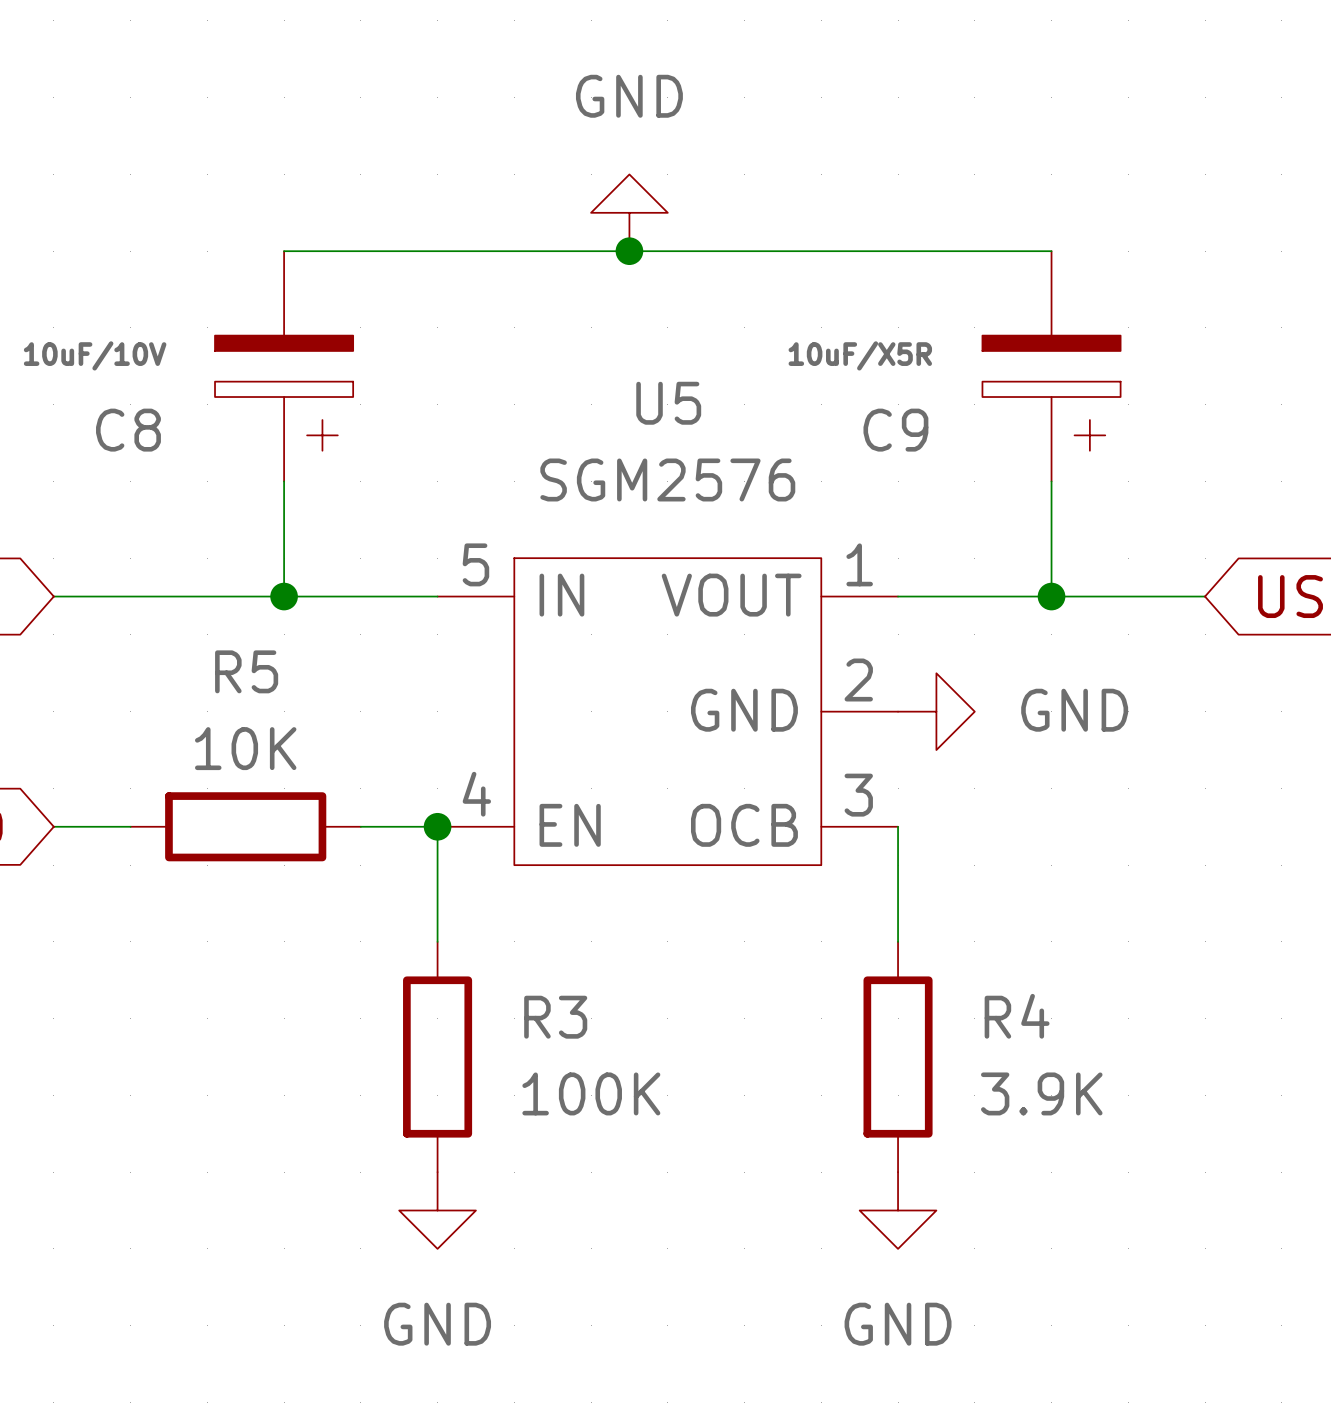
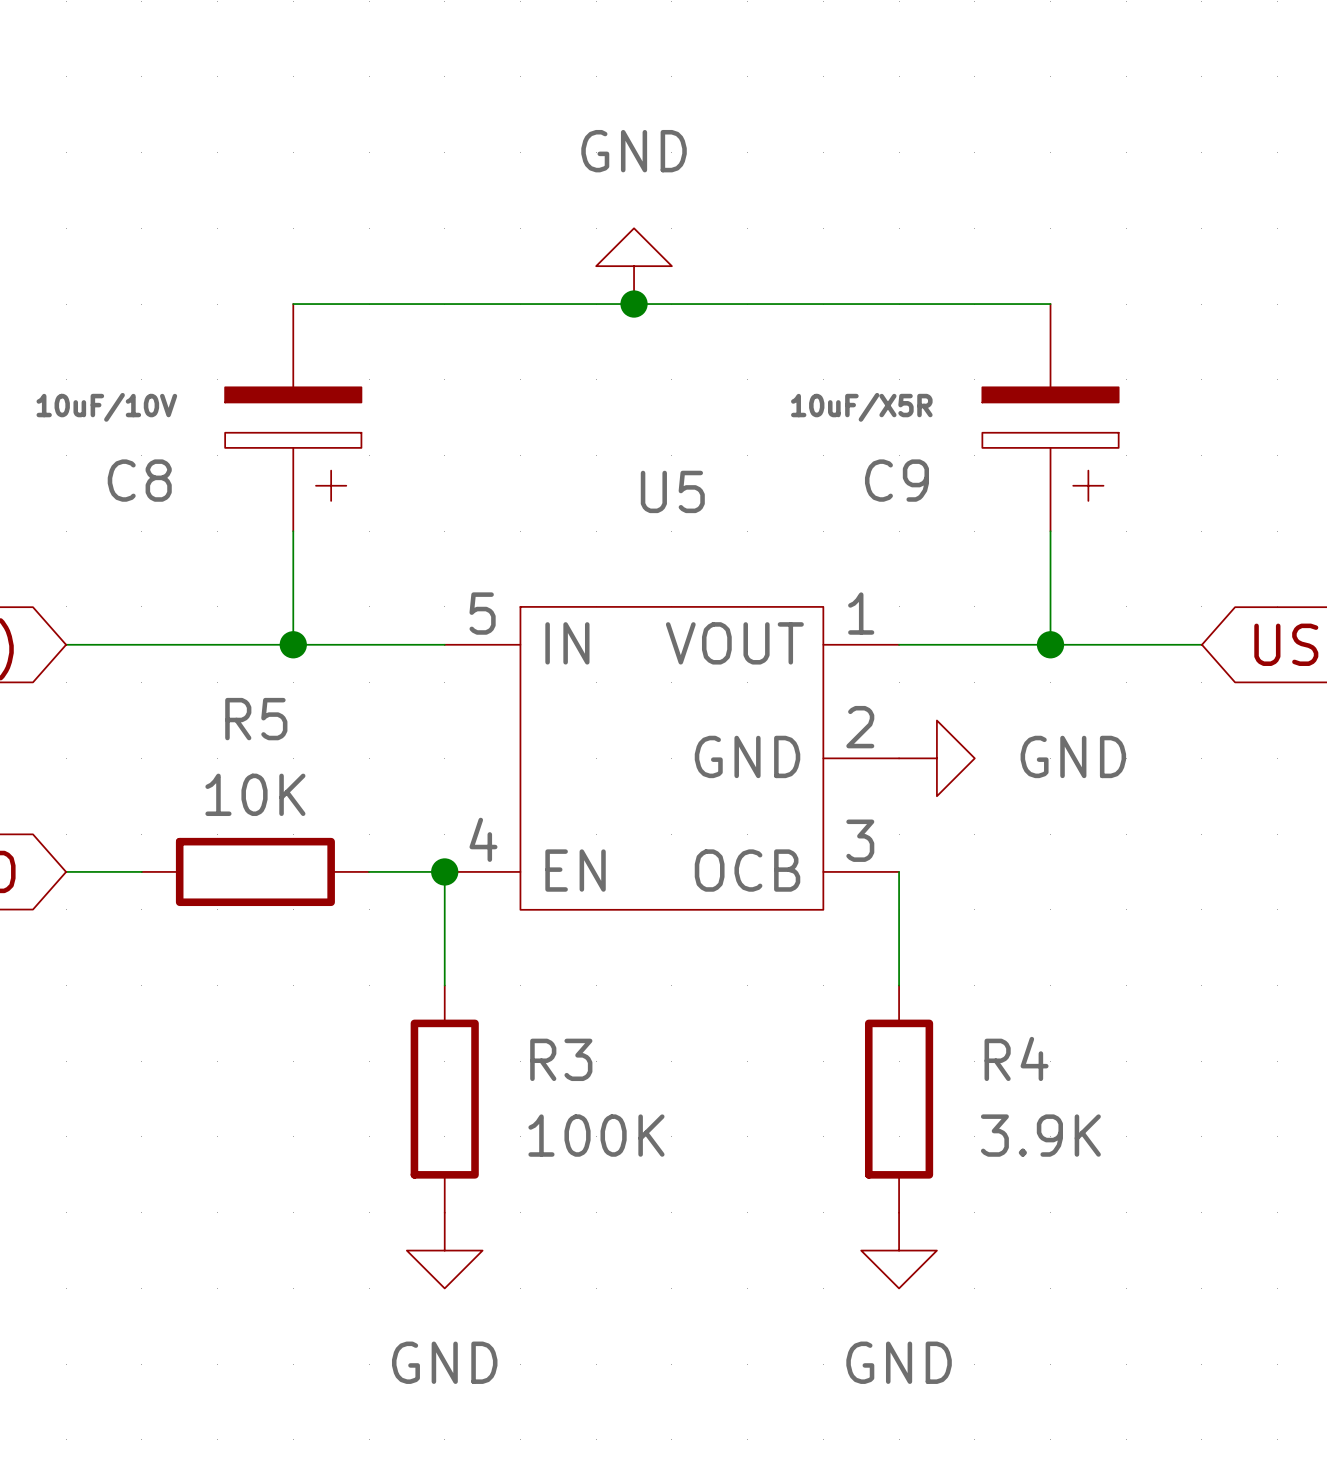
U5 name position: U5 (668, 403) -> U5 (672, 491)
U5 value: SGM2576 (667, 479) -> none

